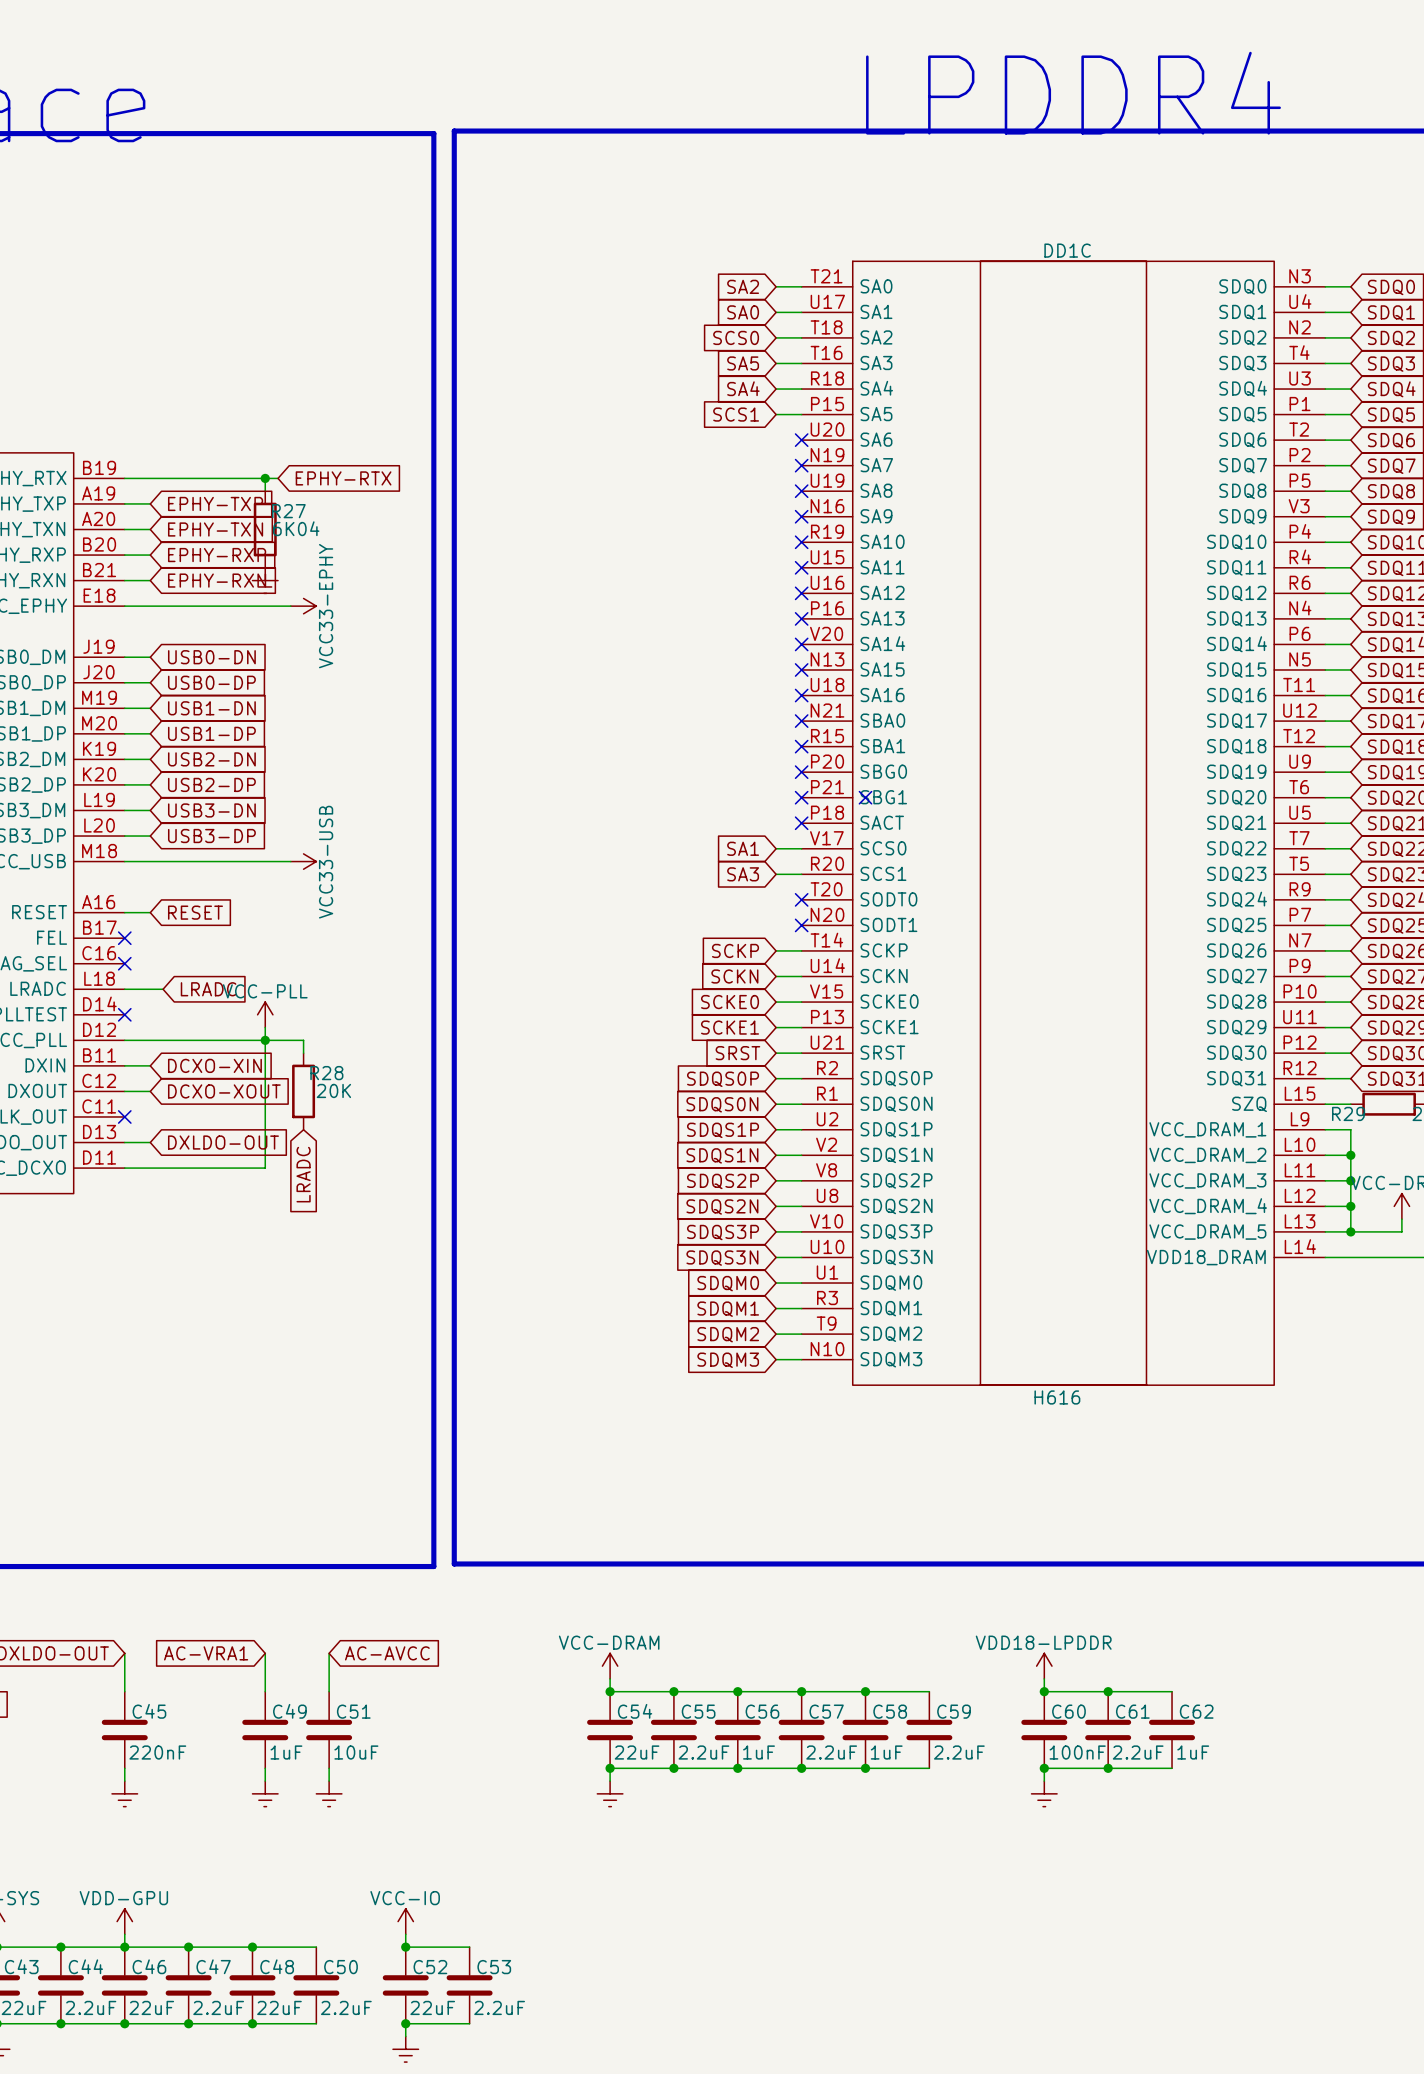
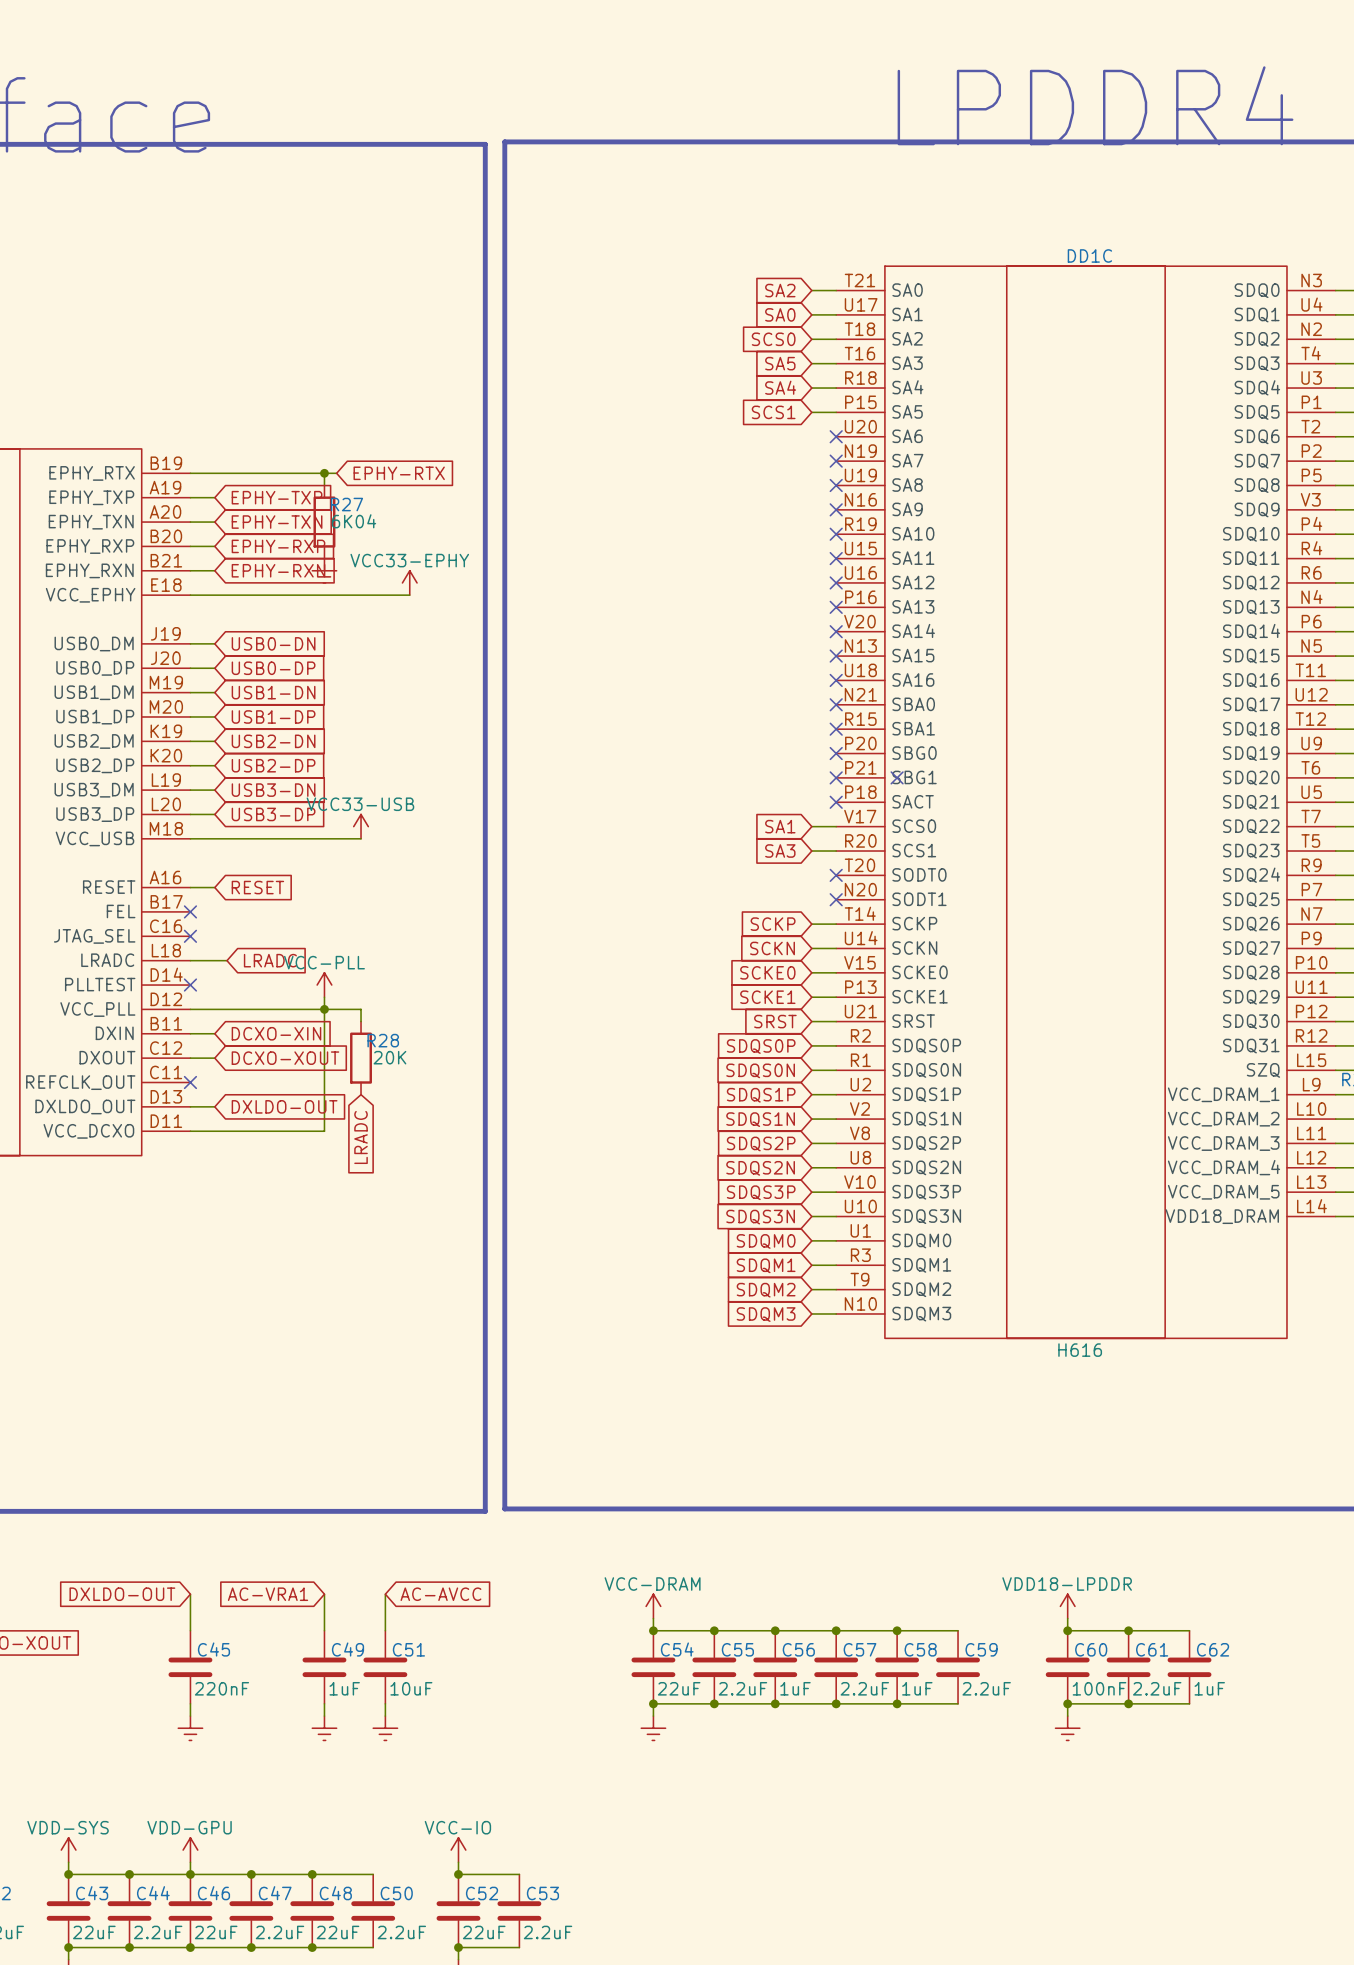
wire: none -> (348, 595) (409, 595)
power symbol rotation: 0° (303, 606) -> 90° counterclockwise (409, 582)
power symbol position: VCC33-EPHY (303, 606) -> VCC33-EPHY (409, 582)
power symbol rotation: 0° (303, 861) -> 90° counterclockwise (361, 826)

